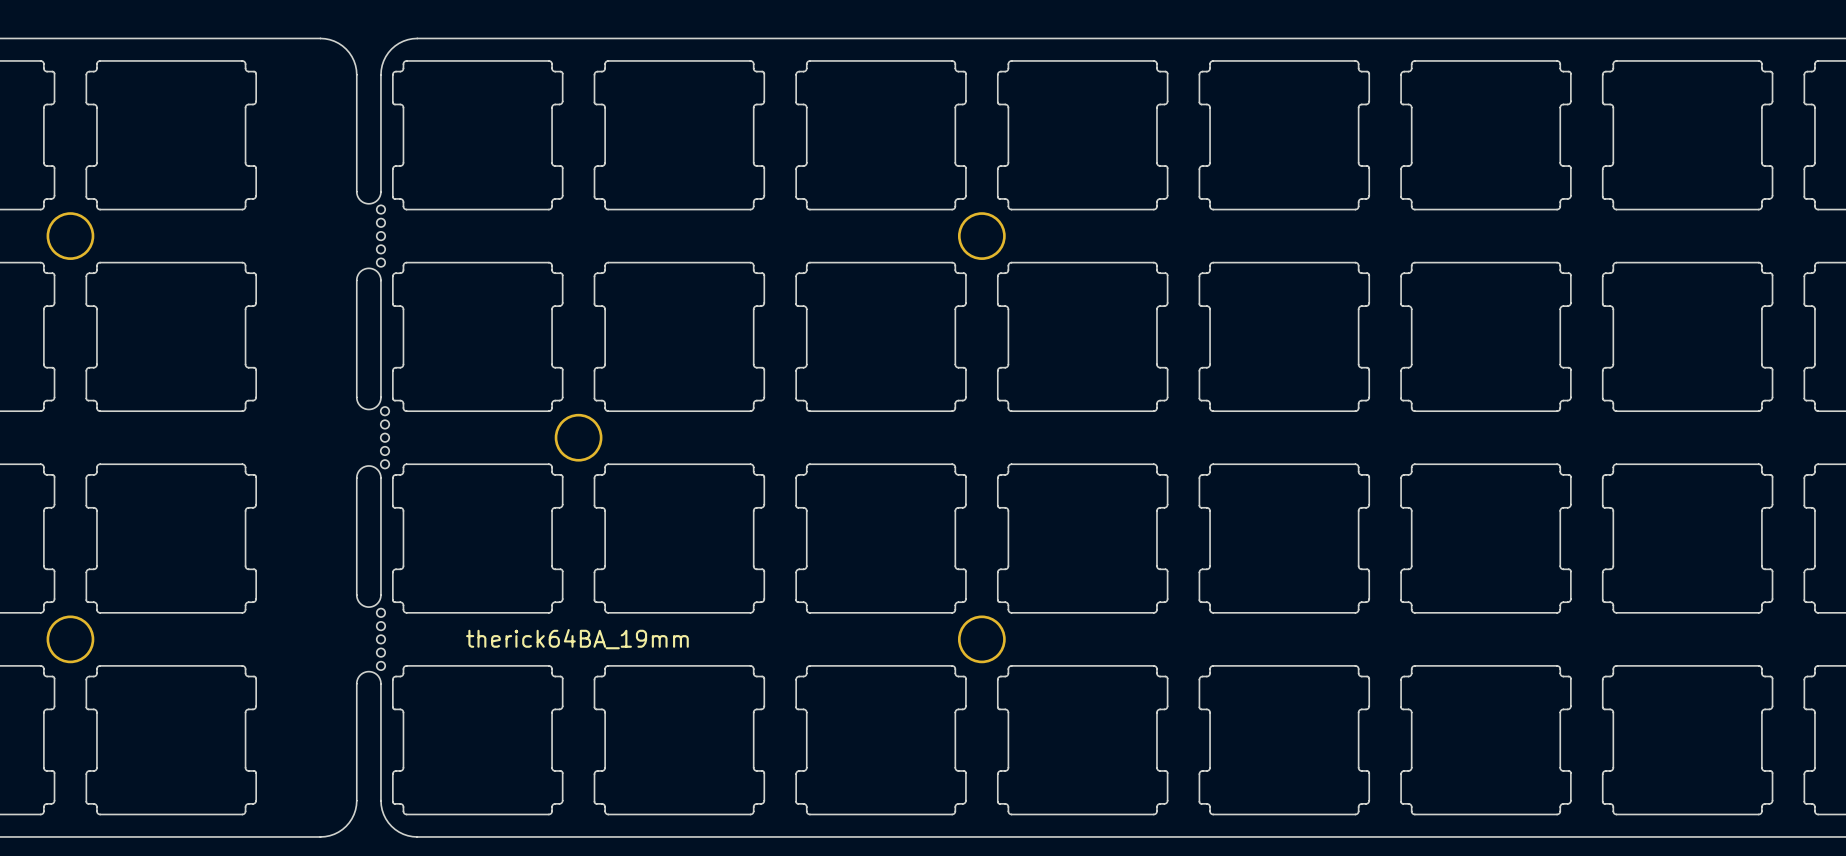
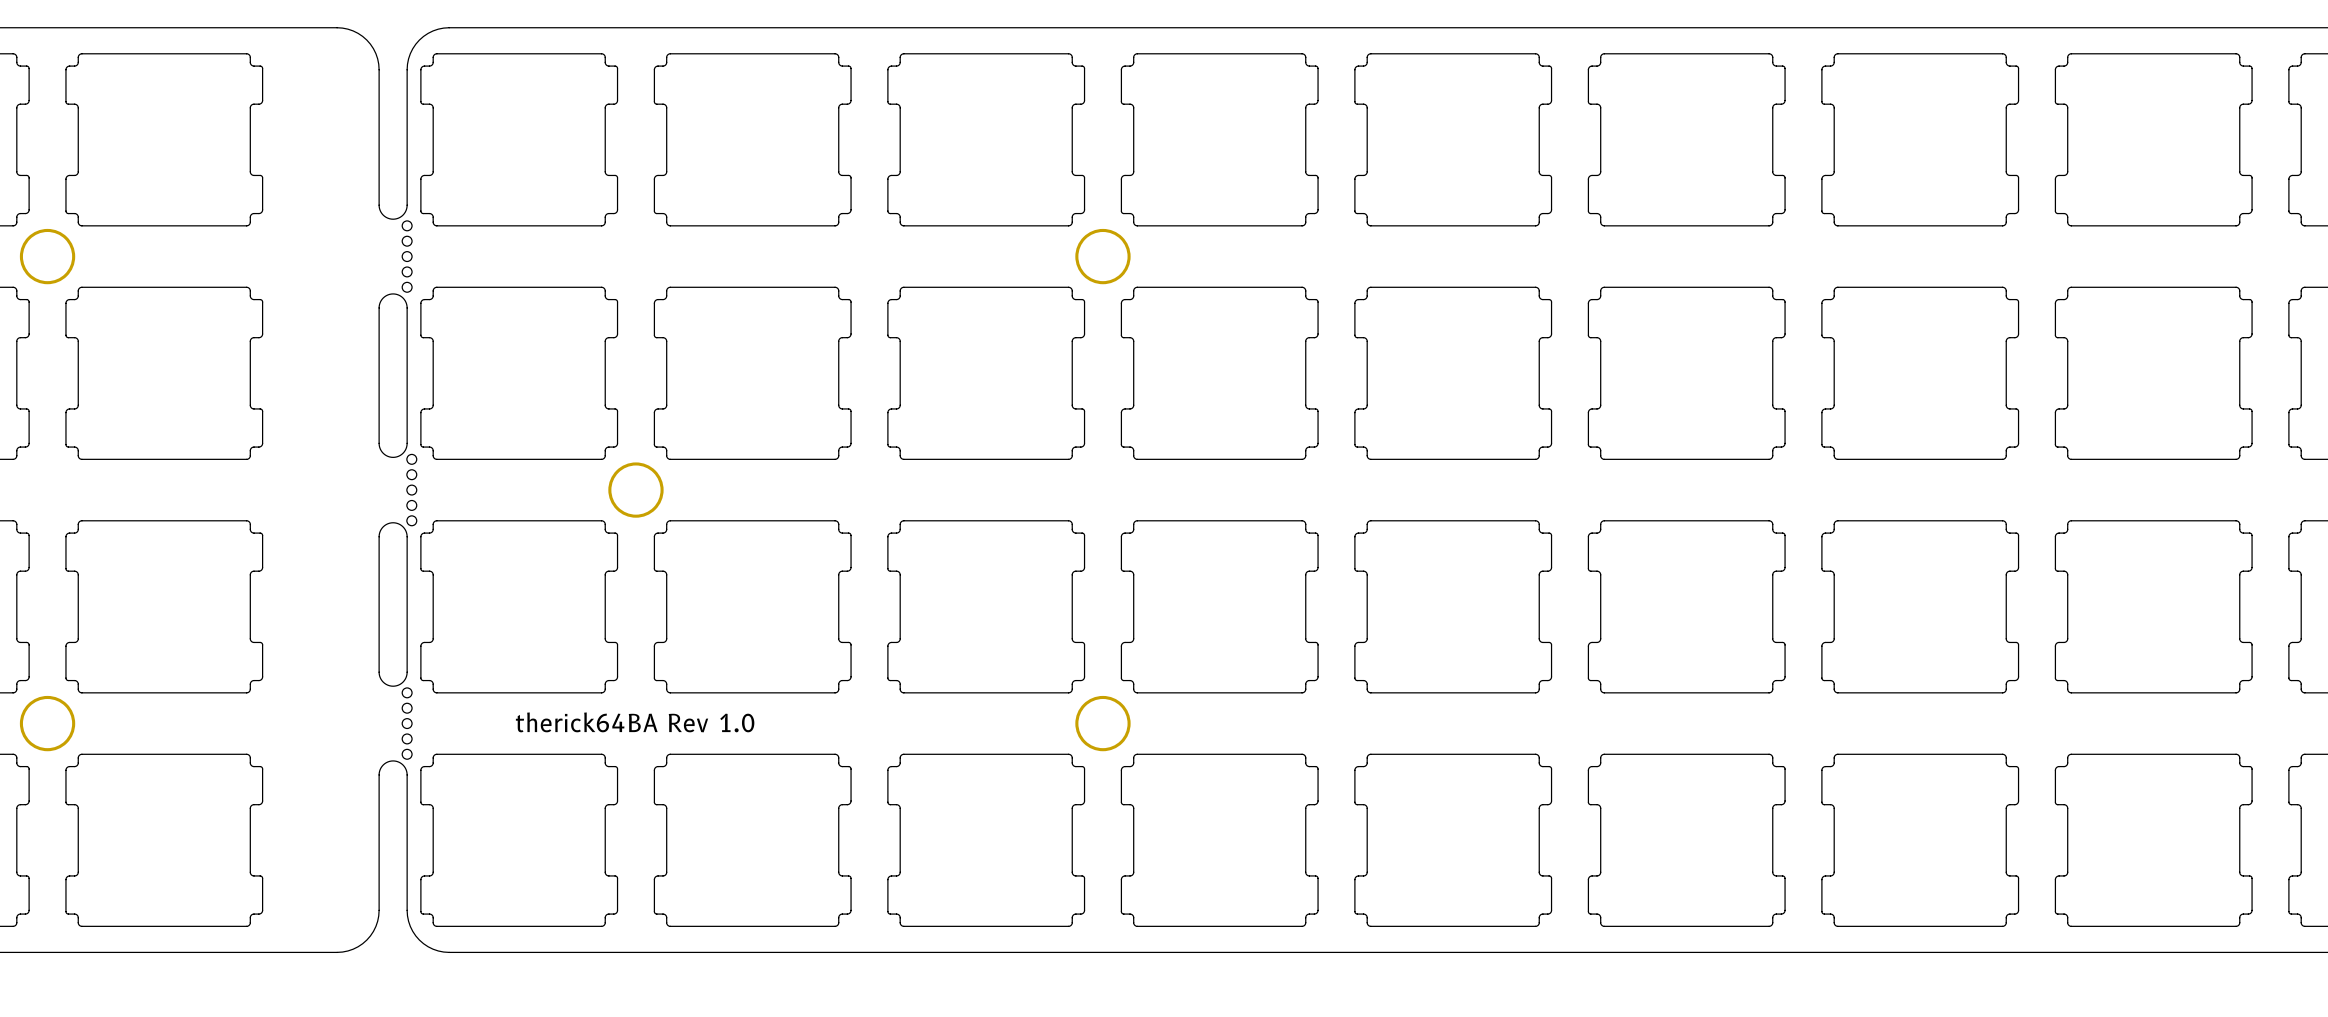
text: therick64BA_19mm (577, 639) -> therick64BA Rev 1.0 (635, 722)

